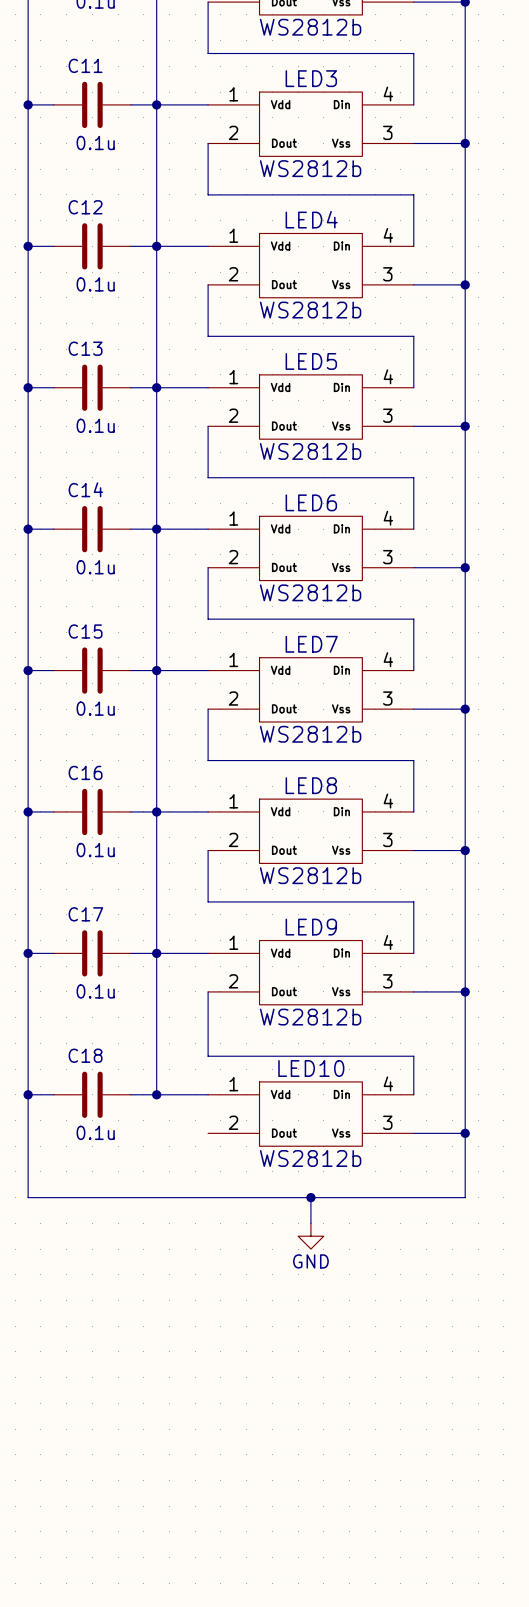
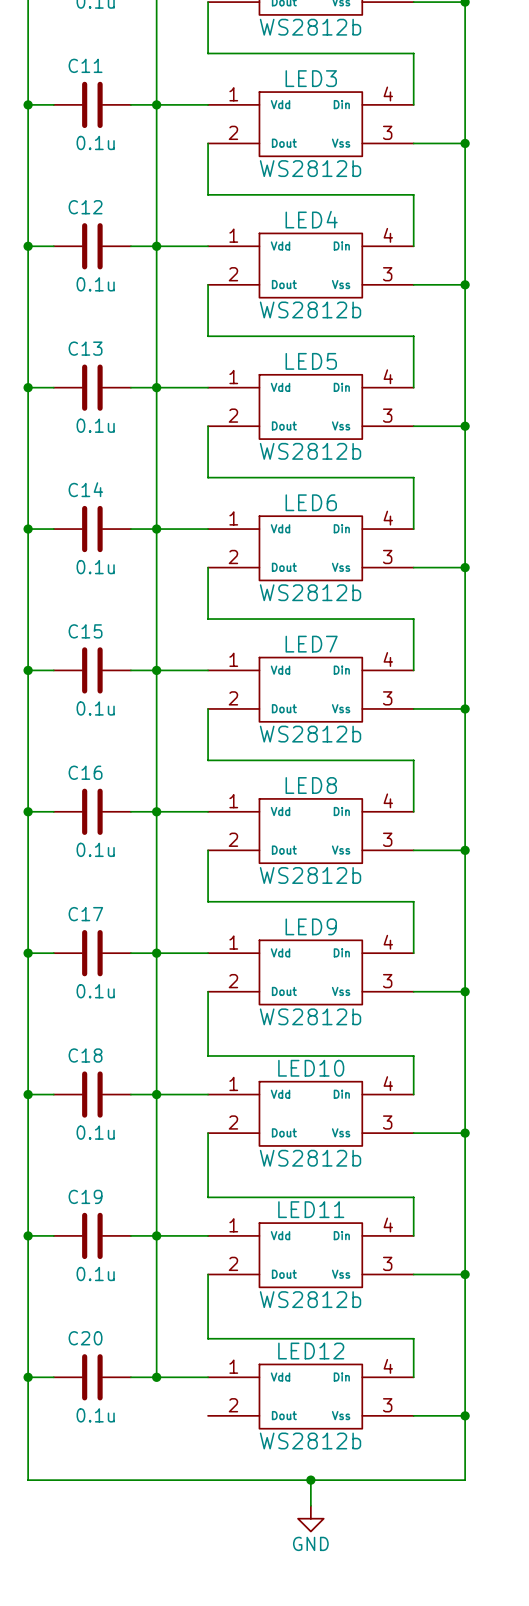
wire: none -> (156, 1094) (156, 1377)
wire: (28, 1197) (208, 1197) -> (208, 1133) (208, 1197)
wire: none -> (28, 1197) (28, 1480) (465, 1480) (465, 1197)
wire: (310, 1197) (310, 1223) -> none
junction: (310, 1197) -> none
wire: (413, 1197) (465, 1197) -> (413, 1197) (413, 1235)
wire: none -> (28, 1235) (53, 1235)
junction: none -> (28, 1235)
C19: none -> 0.1u (92, 1235)
wire: none -> (130, 1235) (208, 1235)
junction: none -> (156, 1235)
power symbol: GND (310, 1236) -> none
LED11: none -> WS2812b (310, 1255)
wire: none -> (208, 1274) (208, 1338) (413, 1338) (413, 1377)
wire: none -> (413, 1274) (465, 1274)
junction: none -> (465, 1274)
wire: none -> (28, 1377) (53, 1377)
junction: none -> (28, 1377)
C20: none -> 0.1u (92, 1377)
wire: none -> (130, 1377) (208, 1377)
junction: none -> (156, 1377)
LED12: none -> WS2812b (310, 1396)
wire: none -> (413, 1415) (465, 1415)
junction: none -> (465, 1415)
wire: none -> (310, 1480) (310, 1505)
junction: none -> (310, 1480)
power symbol: none -> GND (310, 1518)

